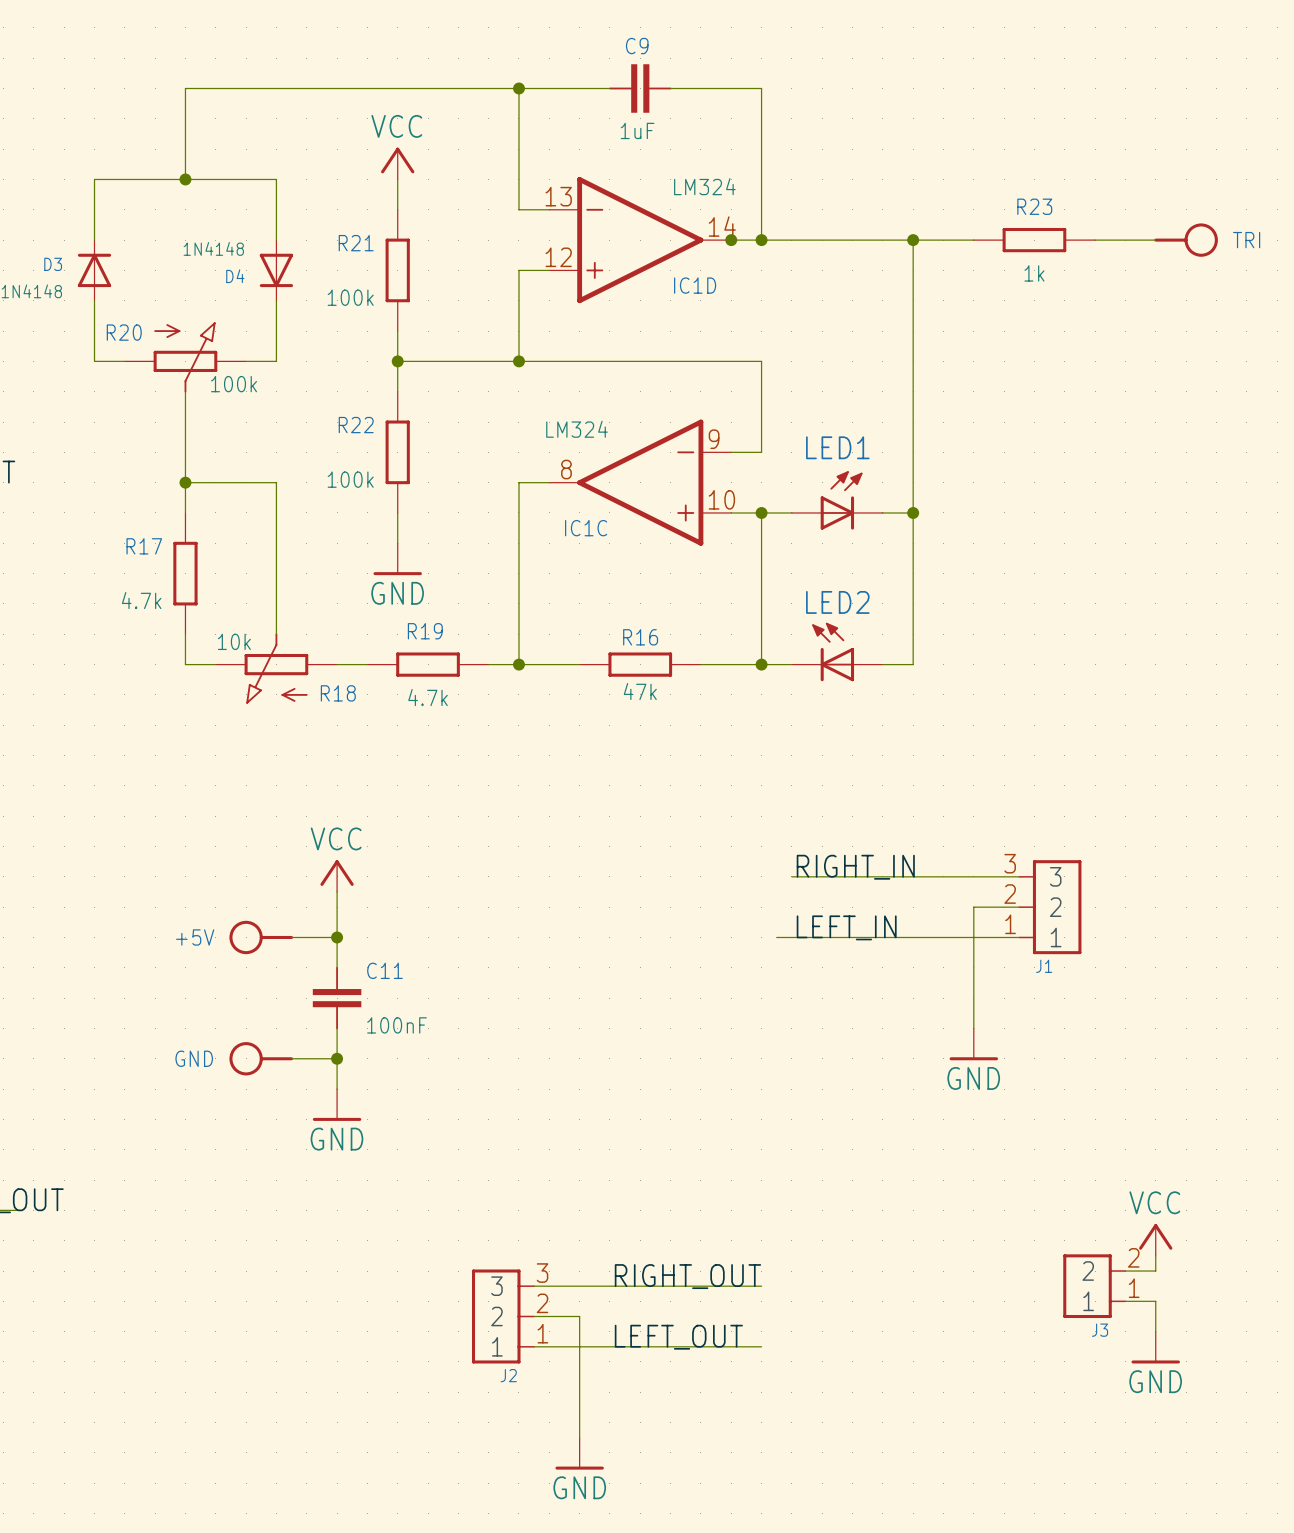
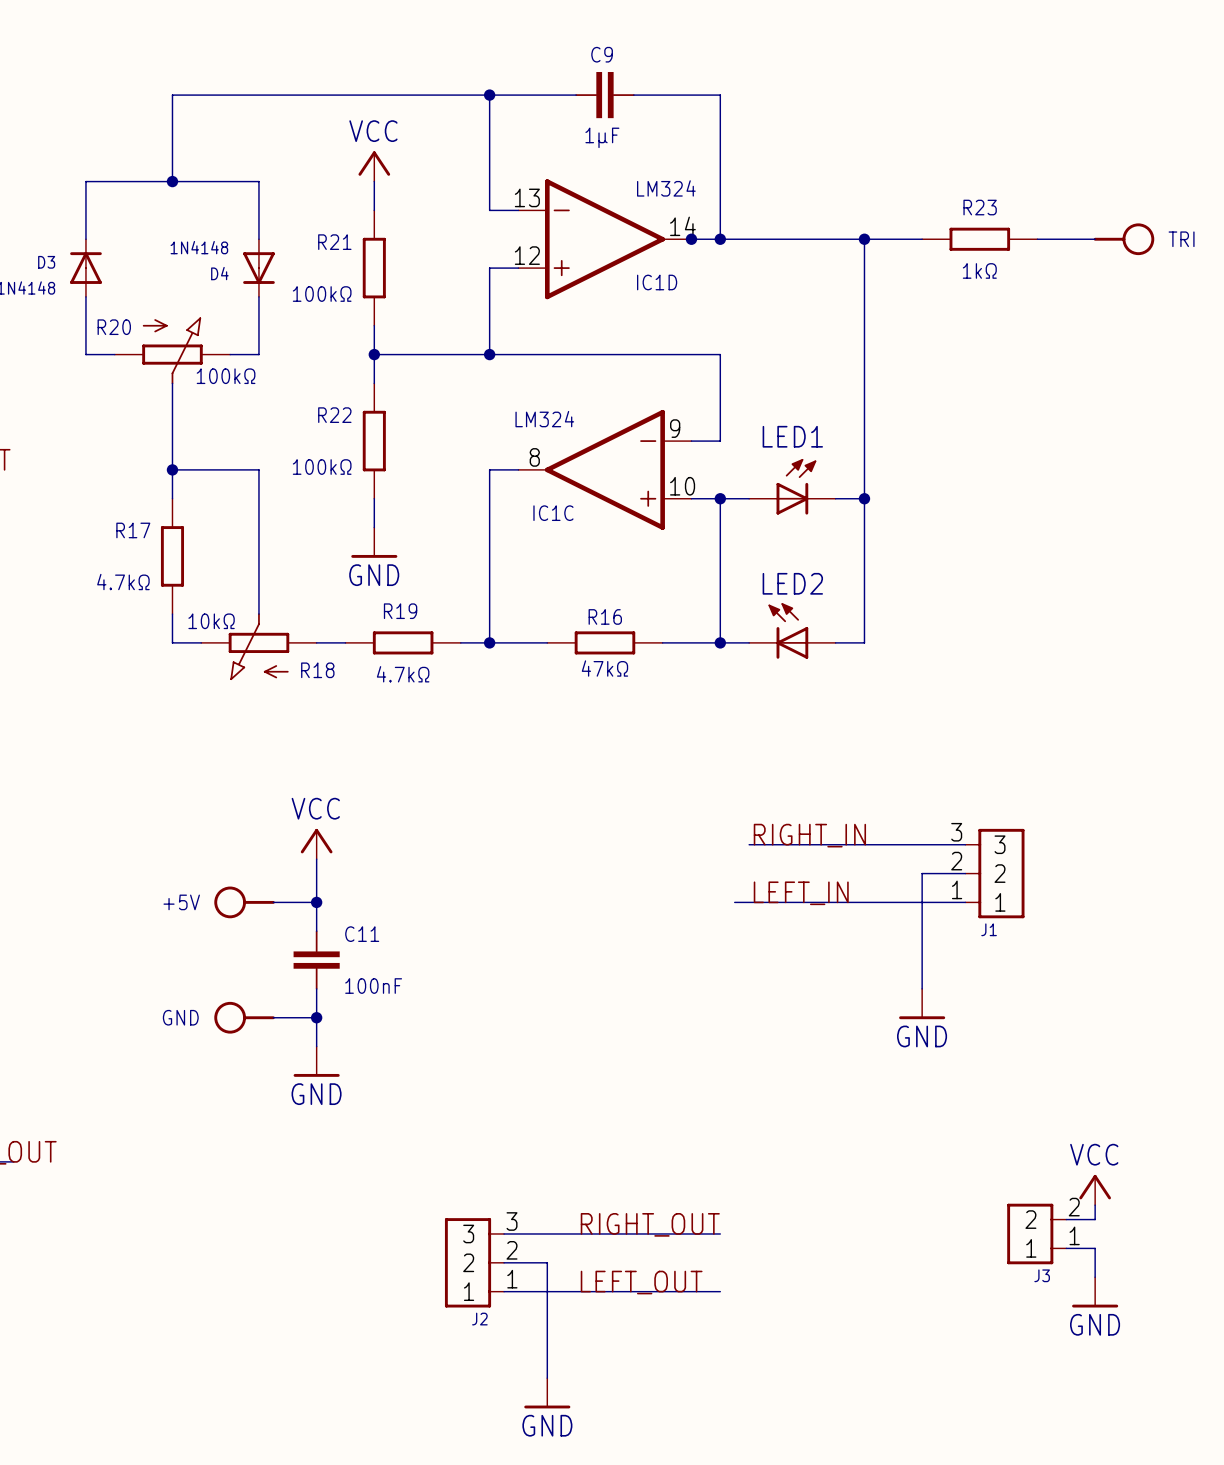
C9 value: 1uF (637, 130) -> 1μF (602, 137)
R23 value: 1k (1034, 273) -> 1kΩ (979, 270)
R21 value: 100k (350, 297) -> 100kΩ (322, 294)
R20 value: 100k (234, 384) -> 100kΩ (226, 376)
R22 value: 100k (350, 479) -> 100kΩ (322, 467)
R17 value: 4.7k (141, 600) -> 4.7kΩ (123, 582)
R18 value: 10k (234, 641) -> 10kΩ (211, 621)
R16 value: 47k (640, 691) -> 47kΩ (604, 668)
R19 value: 4.7k (428, 697) -> 4.7kΩ (403, 674)

